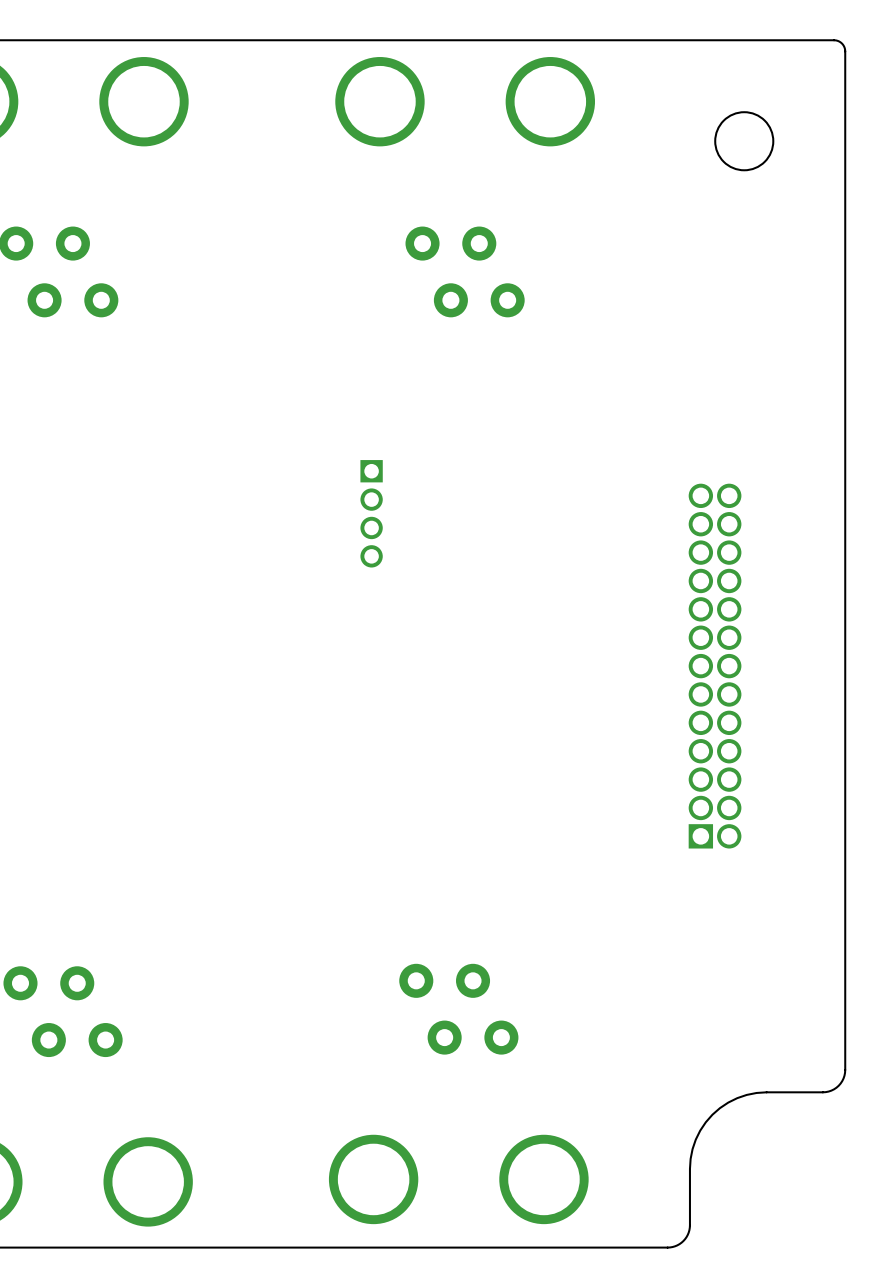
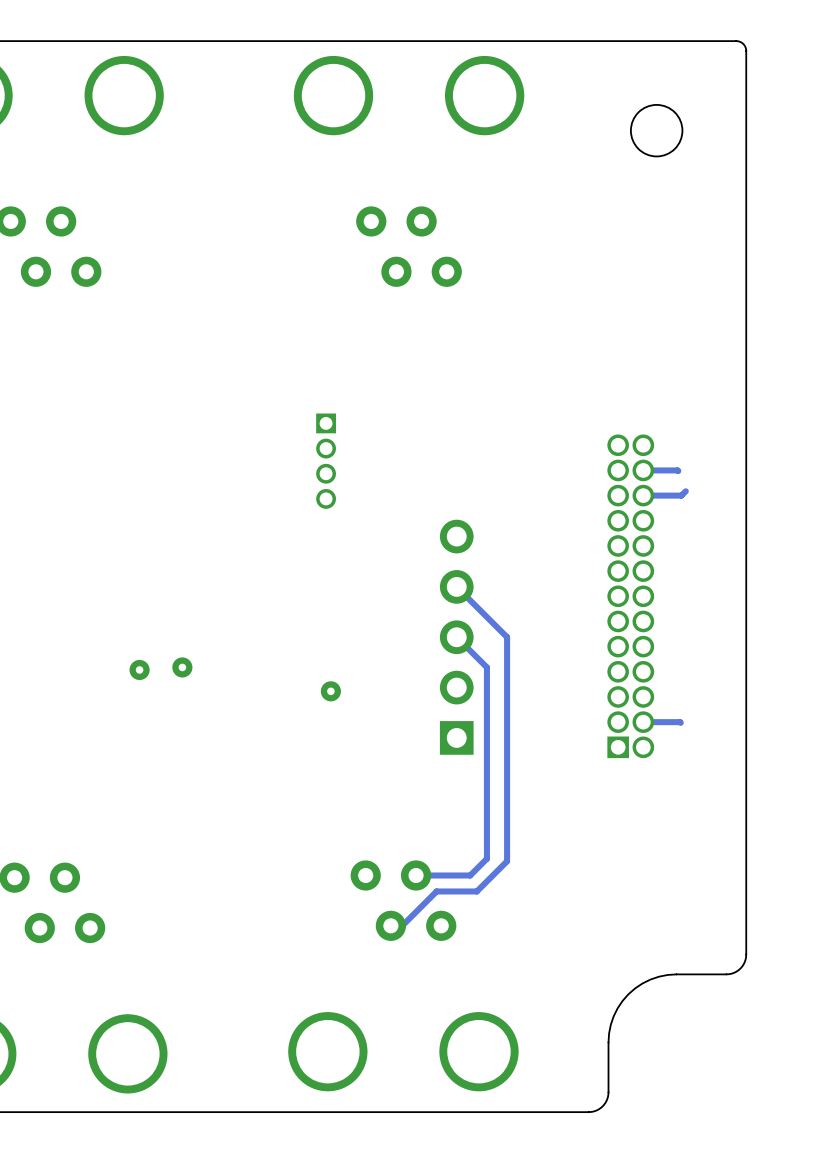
track: none -> (643, 470) (678, 471)
track: none -> (685, 491) (681, 495) (643, 495)
track: none -> (456, 586) (507, 637) (507, 861) (476, 891) (436, 891) (402, 925) (390, 925)
track: none -> (456, 637) (486, 667) (486, 858) (470, 875) (416, 875)
part: none -> (456, 637)
via: none -> (182, 667)
via: none -> (139, 669)
via: none -> (330, 691)
track: none -> (643, 722) (680, 722)

